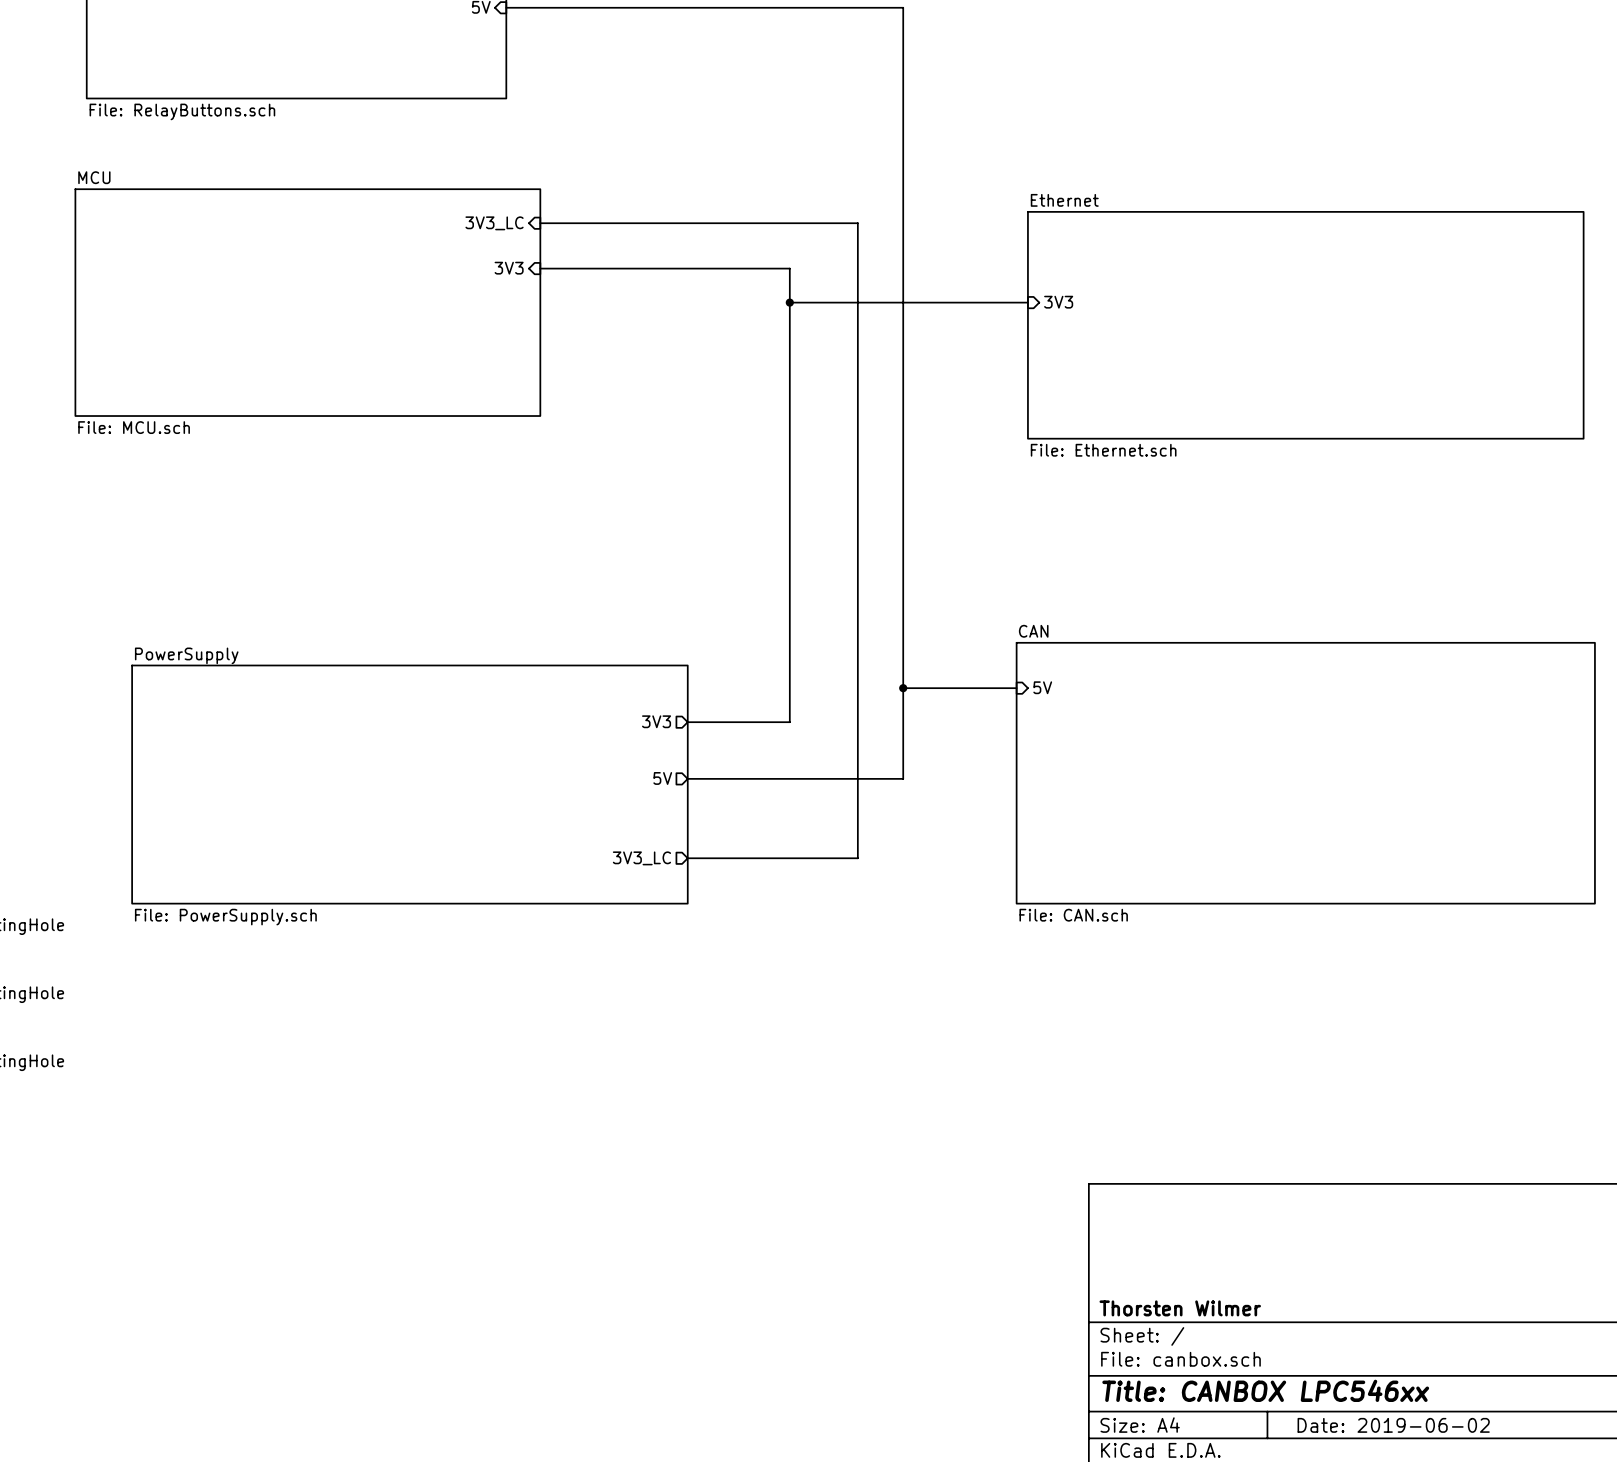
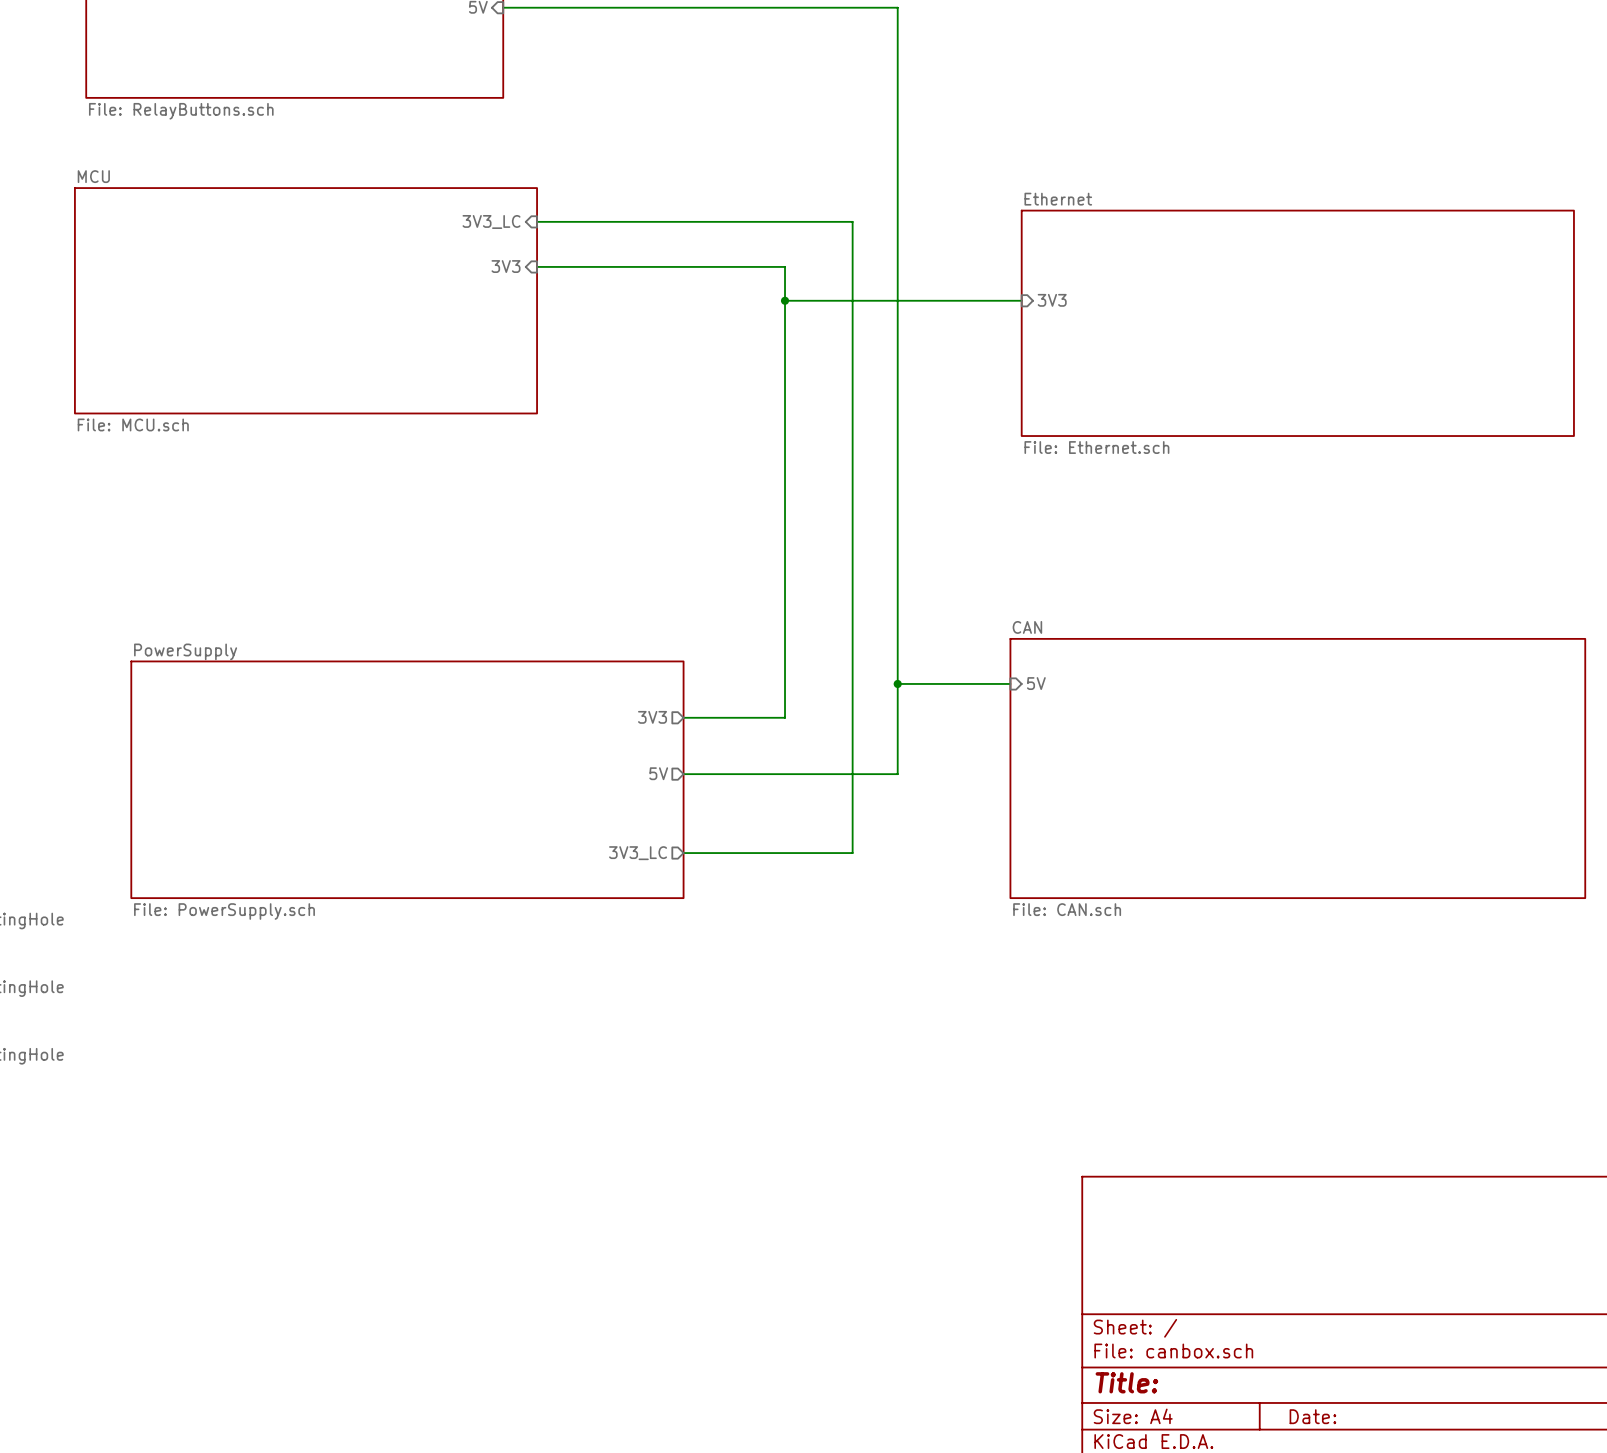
title block: Thorsten Wilmer (1180, 1308) -> none
title block: Title: CANBOX LPC546xx (1265, 1390) -> Title: (1126, 1382)
title block: Date: 2019-06-02 (1393, 1425) -> Date: (1312, 1416)

